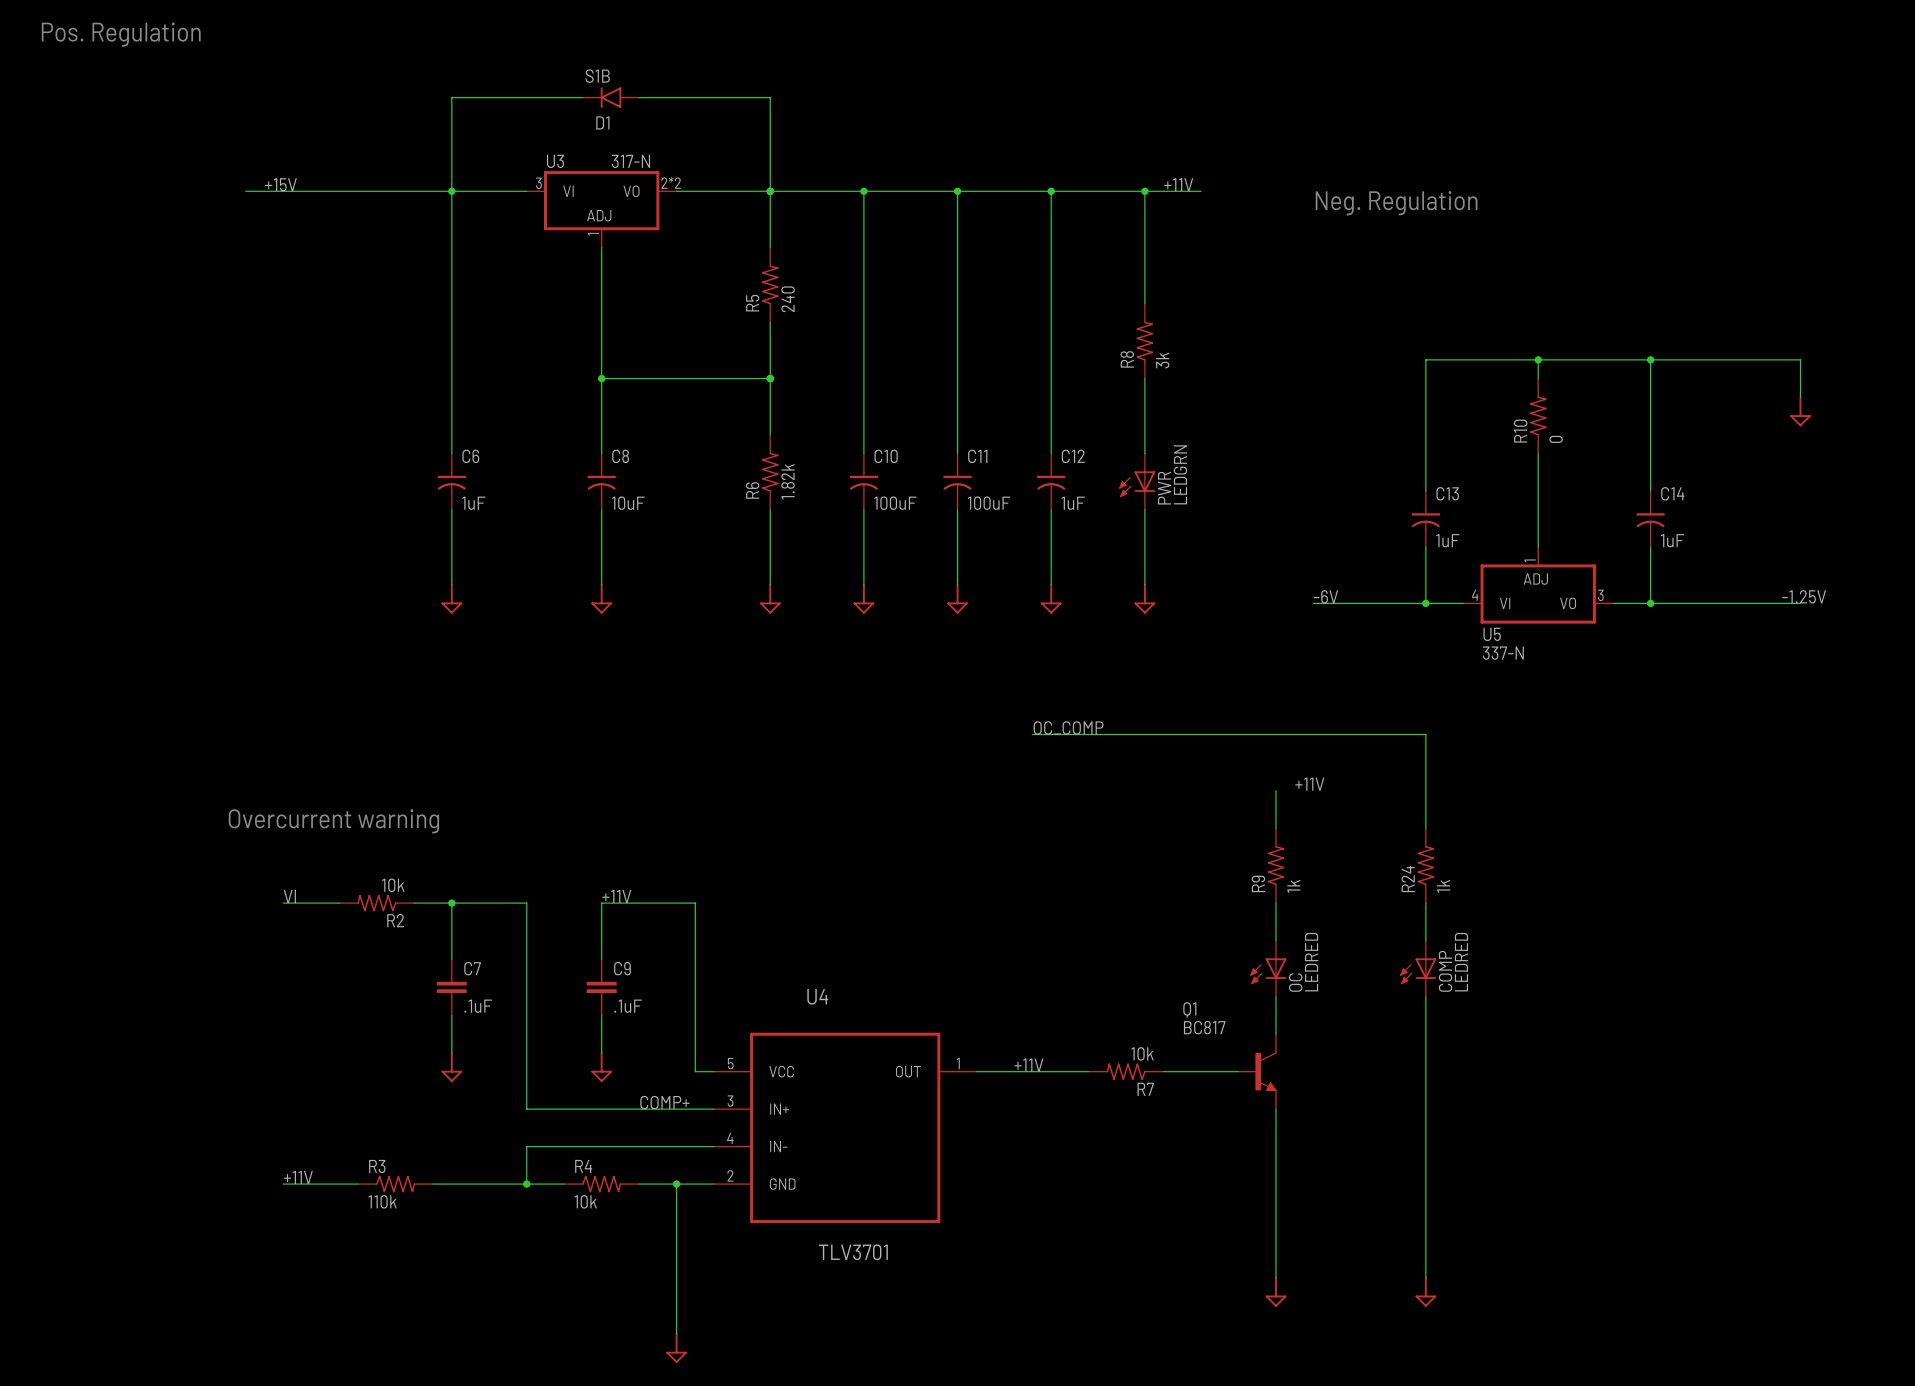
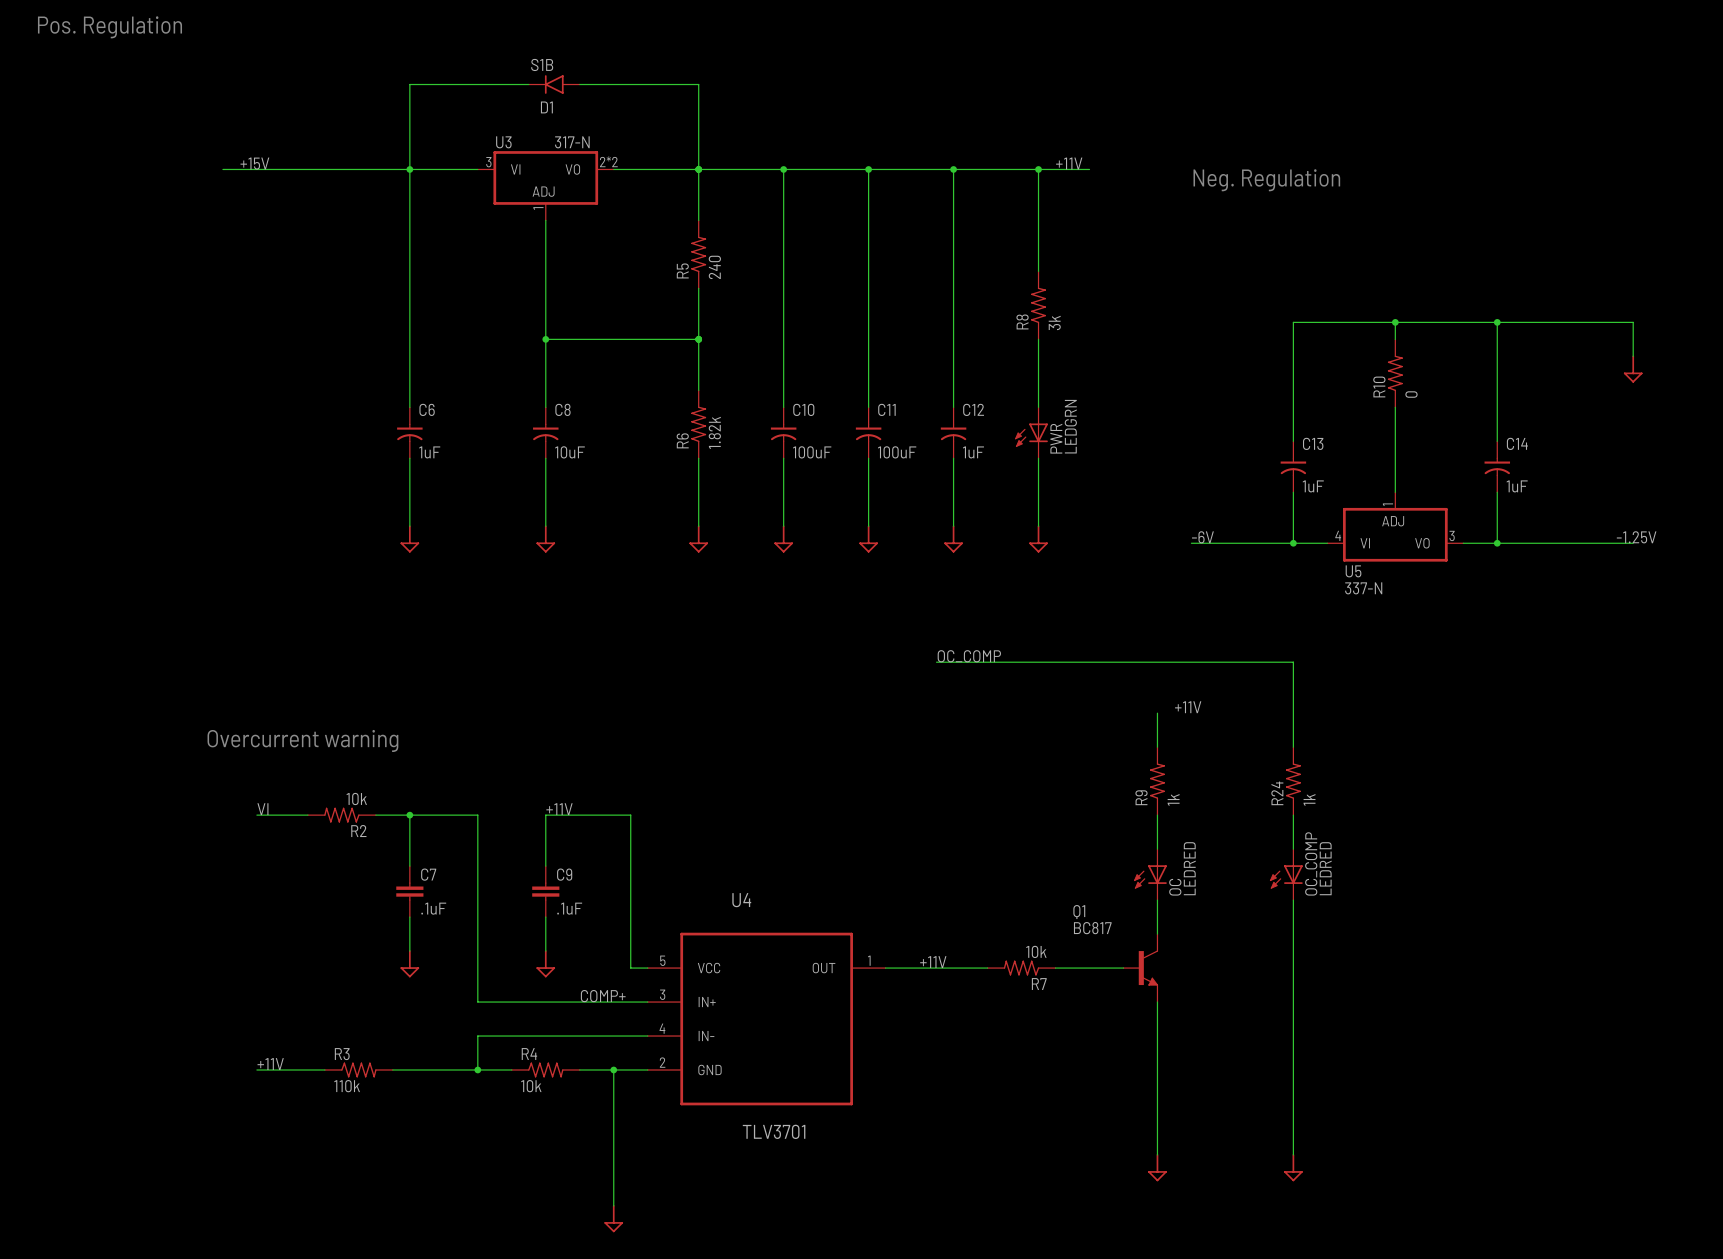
COMP name: COMP (1445, 971) -> OC_COMP (1311, 863)

